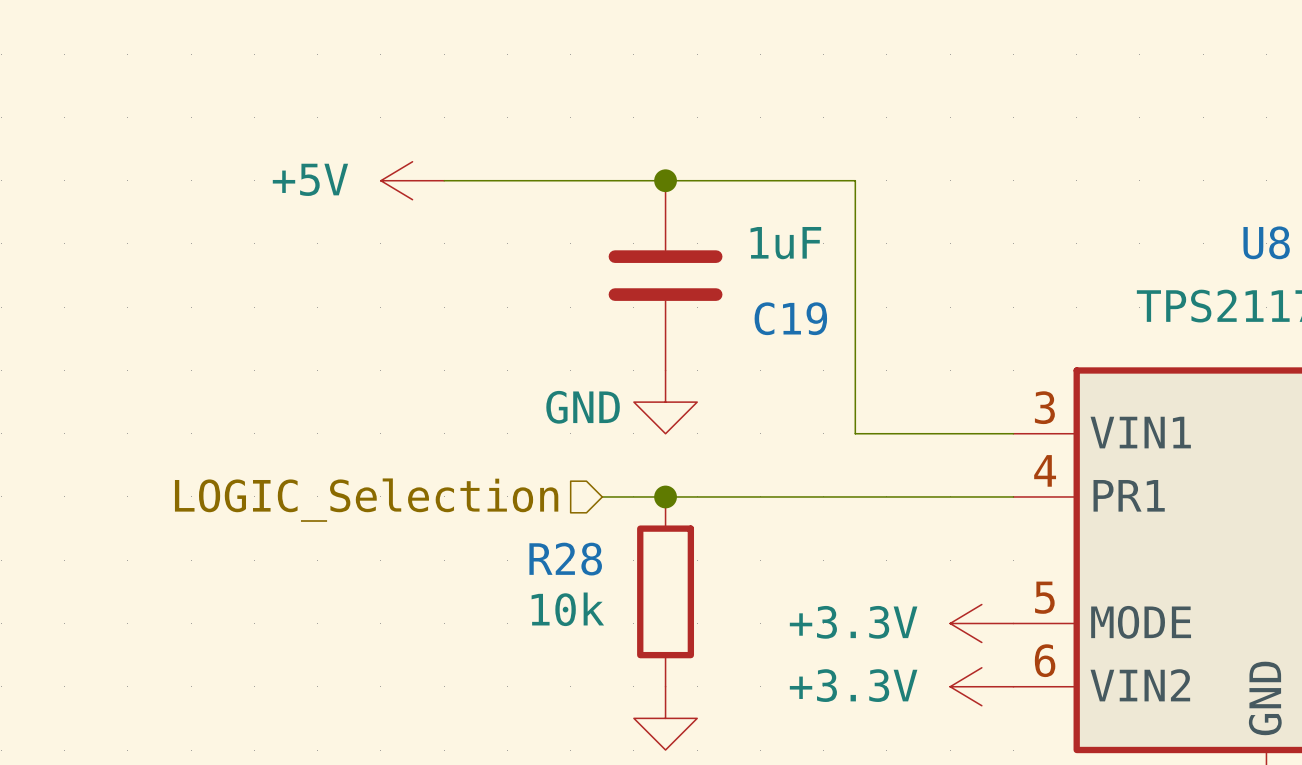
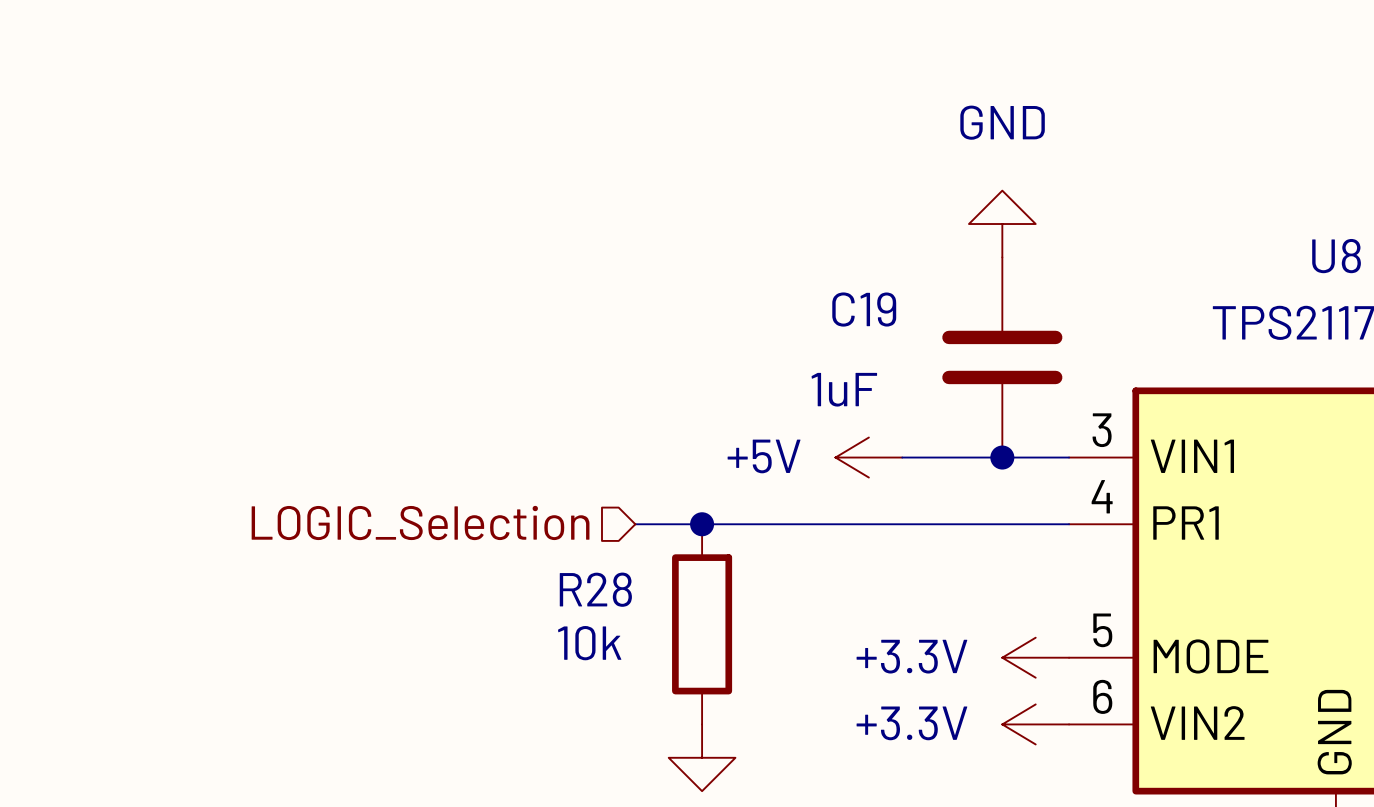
power symbol position: +5V (412, 180) -> +5V (868, 457)
wire: (444, 180) (855, 180) (855, 433) -> none
junction: (665, 180) -> none
C19 value position: 1uF (785, 243) -> 1uF (844, 389)
C19 position: (665, 275) -> (1002, 357)
C19 name position: C19 (790, 318) -> C19 (864, 309)
power symbol rotation: 0° (665, 402) -> 180° (1002, 224)
power symbol position: GND (665, 402) -> GND (1002, 224)
power symbol text position: GND (583, 407) -> GND (1002, 122)
junction: none -> (1002, 457)

